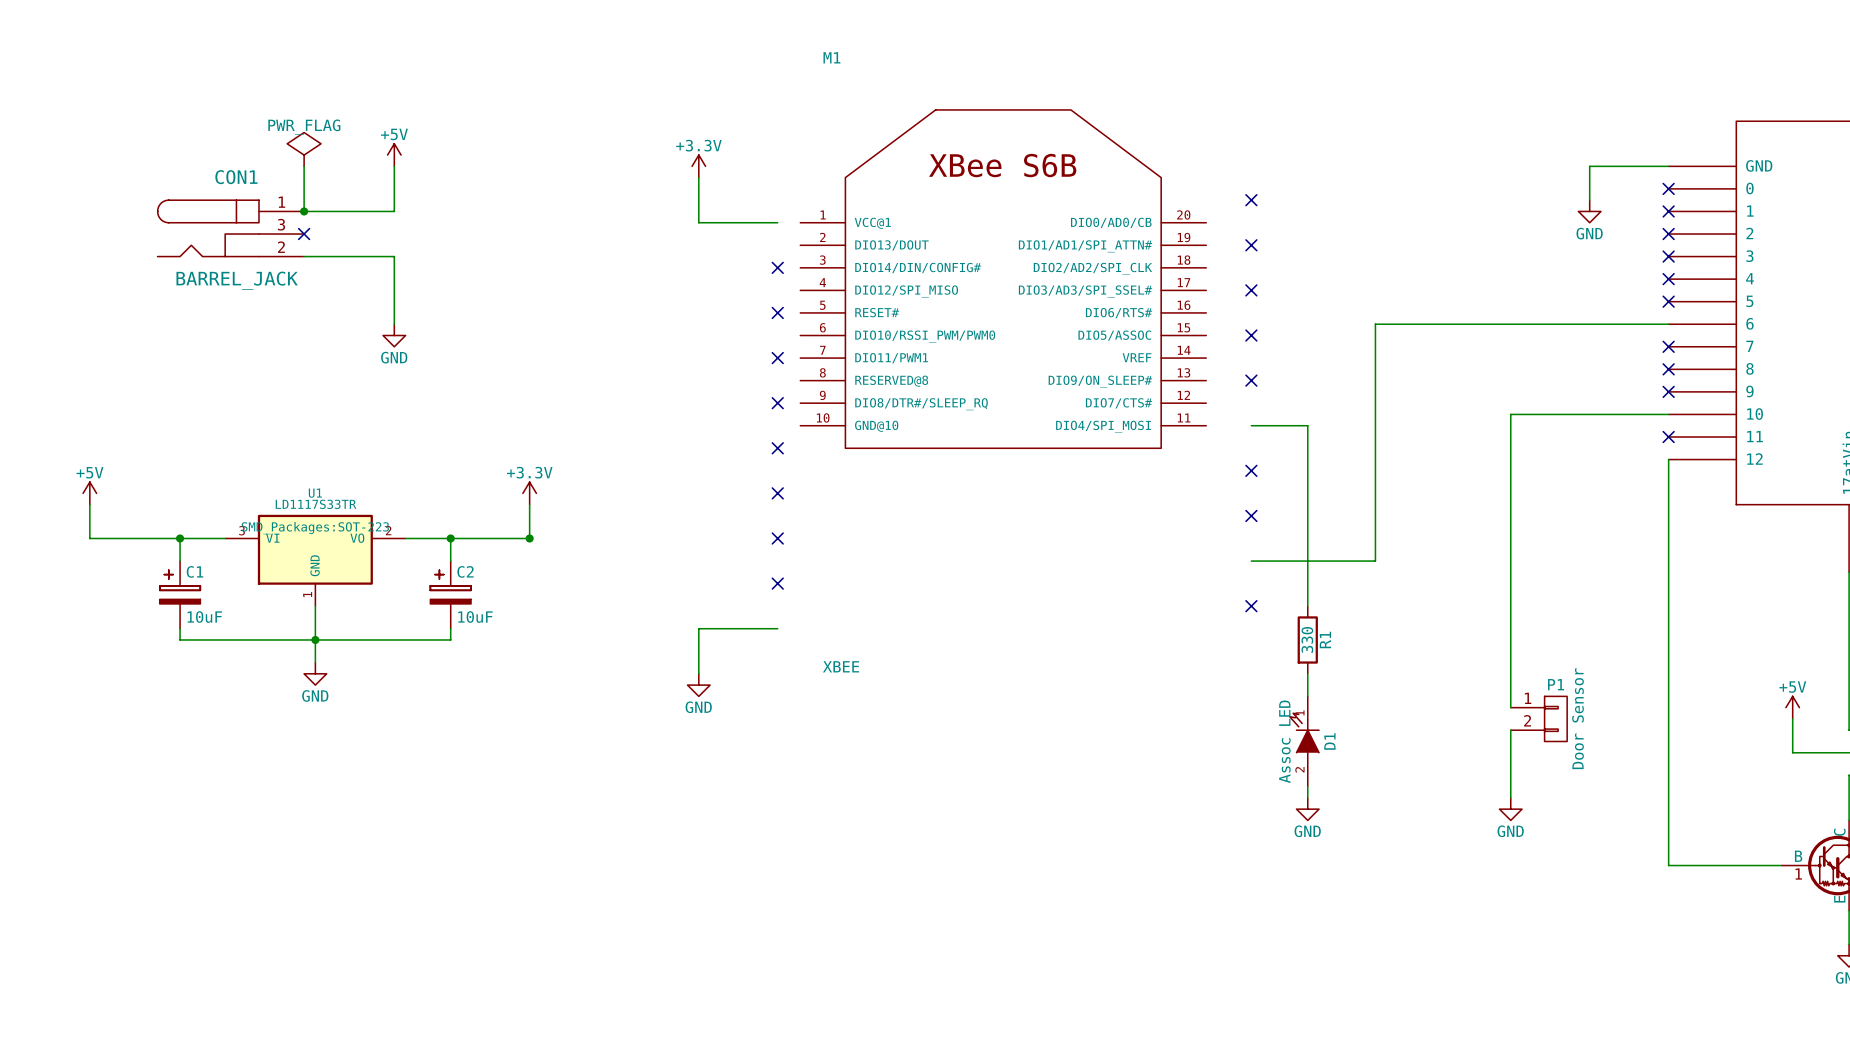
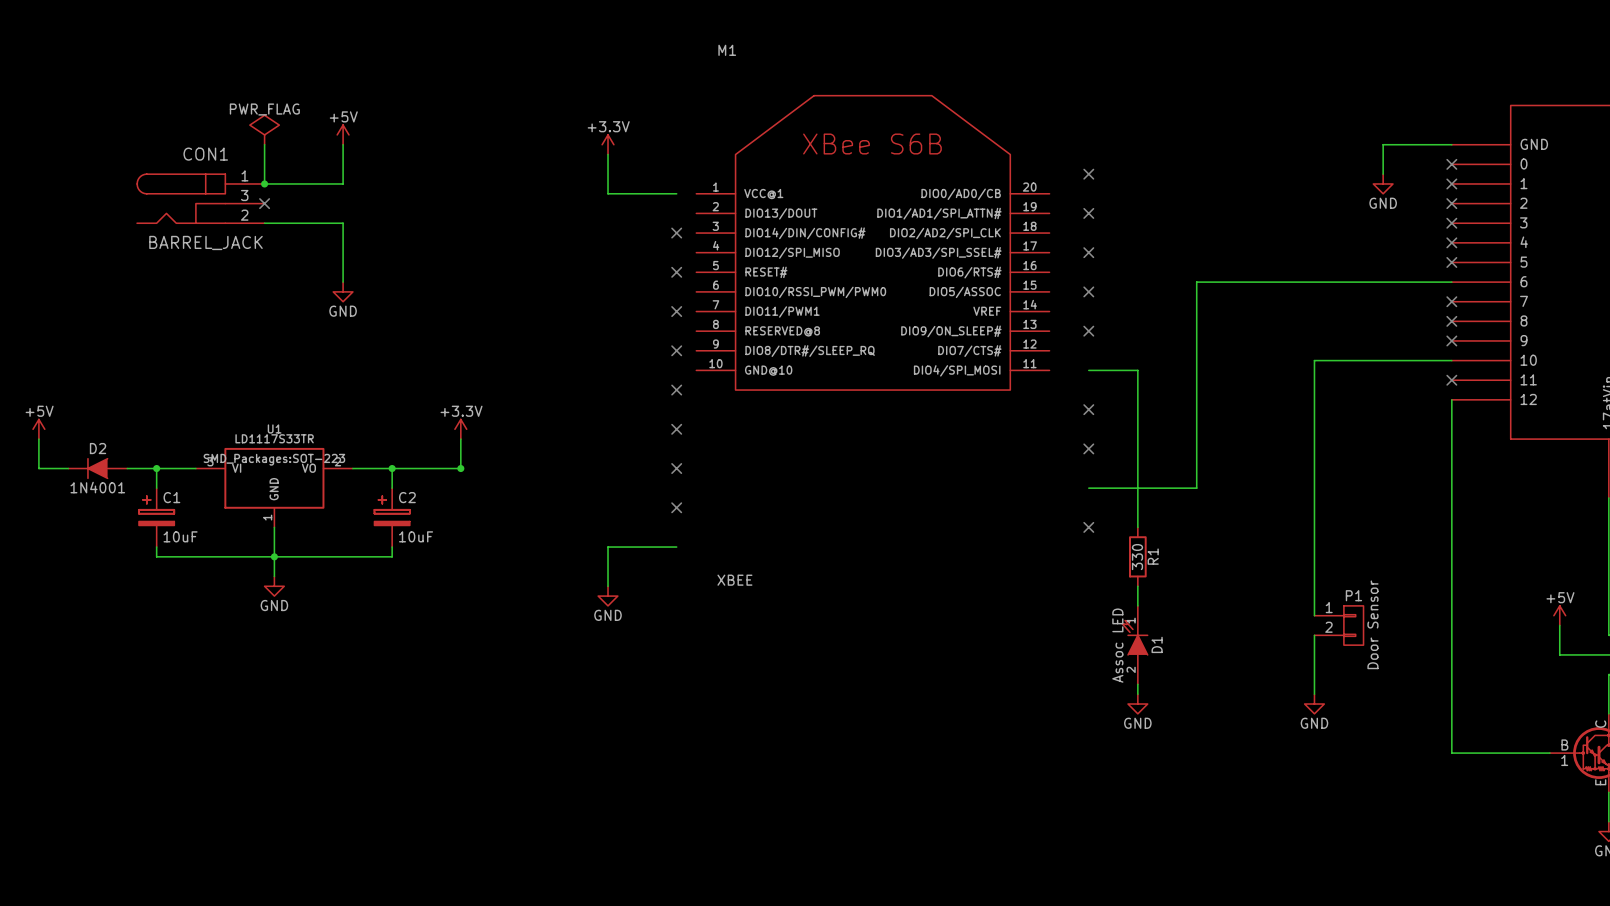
power symbol position: +5V (89, 493) -> +5V (38, 429)
wire: none -> (38, 439) (38, 468) (68, 468)
wire: (89, 504) (89, 538) (146, 538) -> none
D2: none -> 1N4001 (97, 468)

